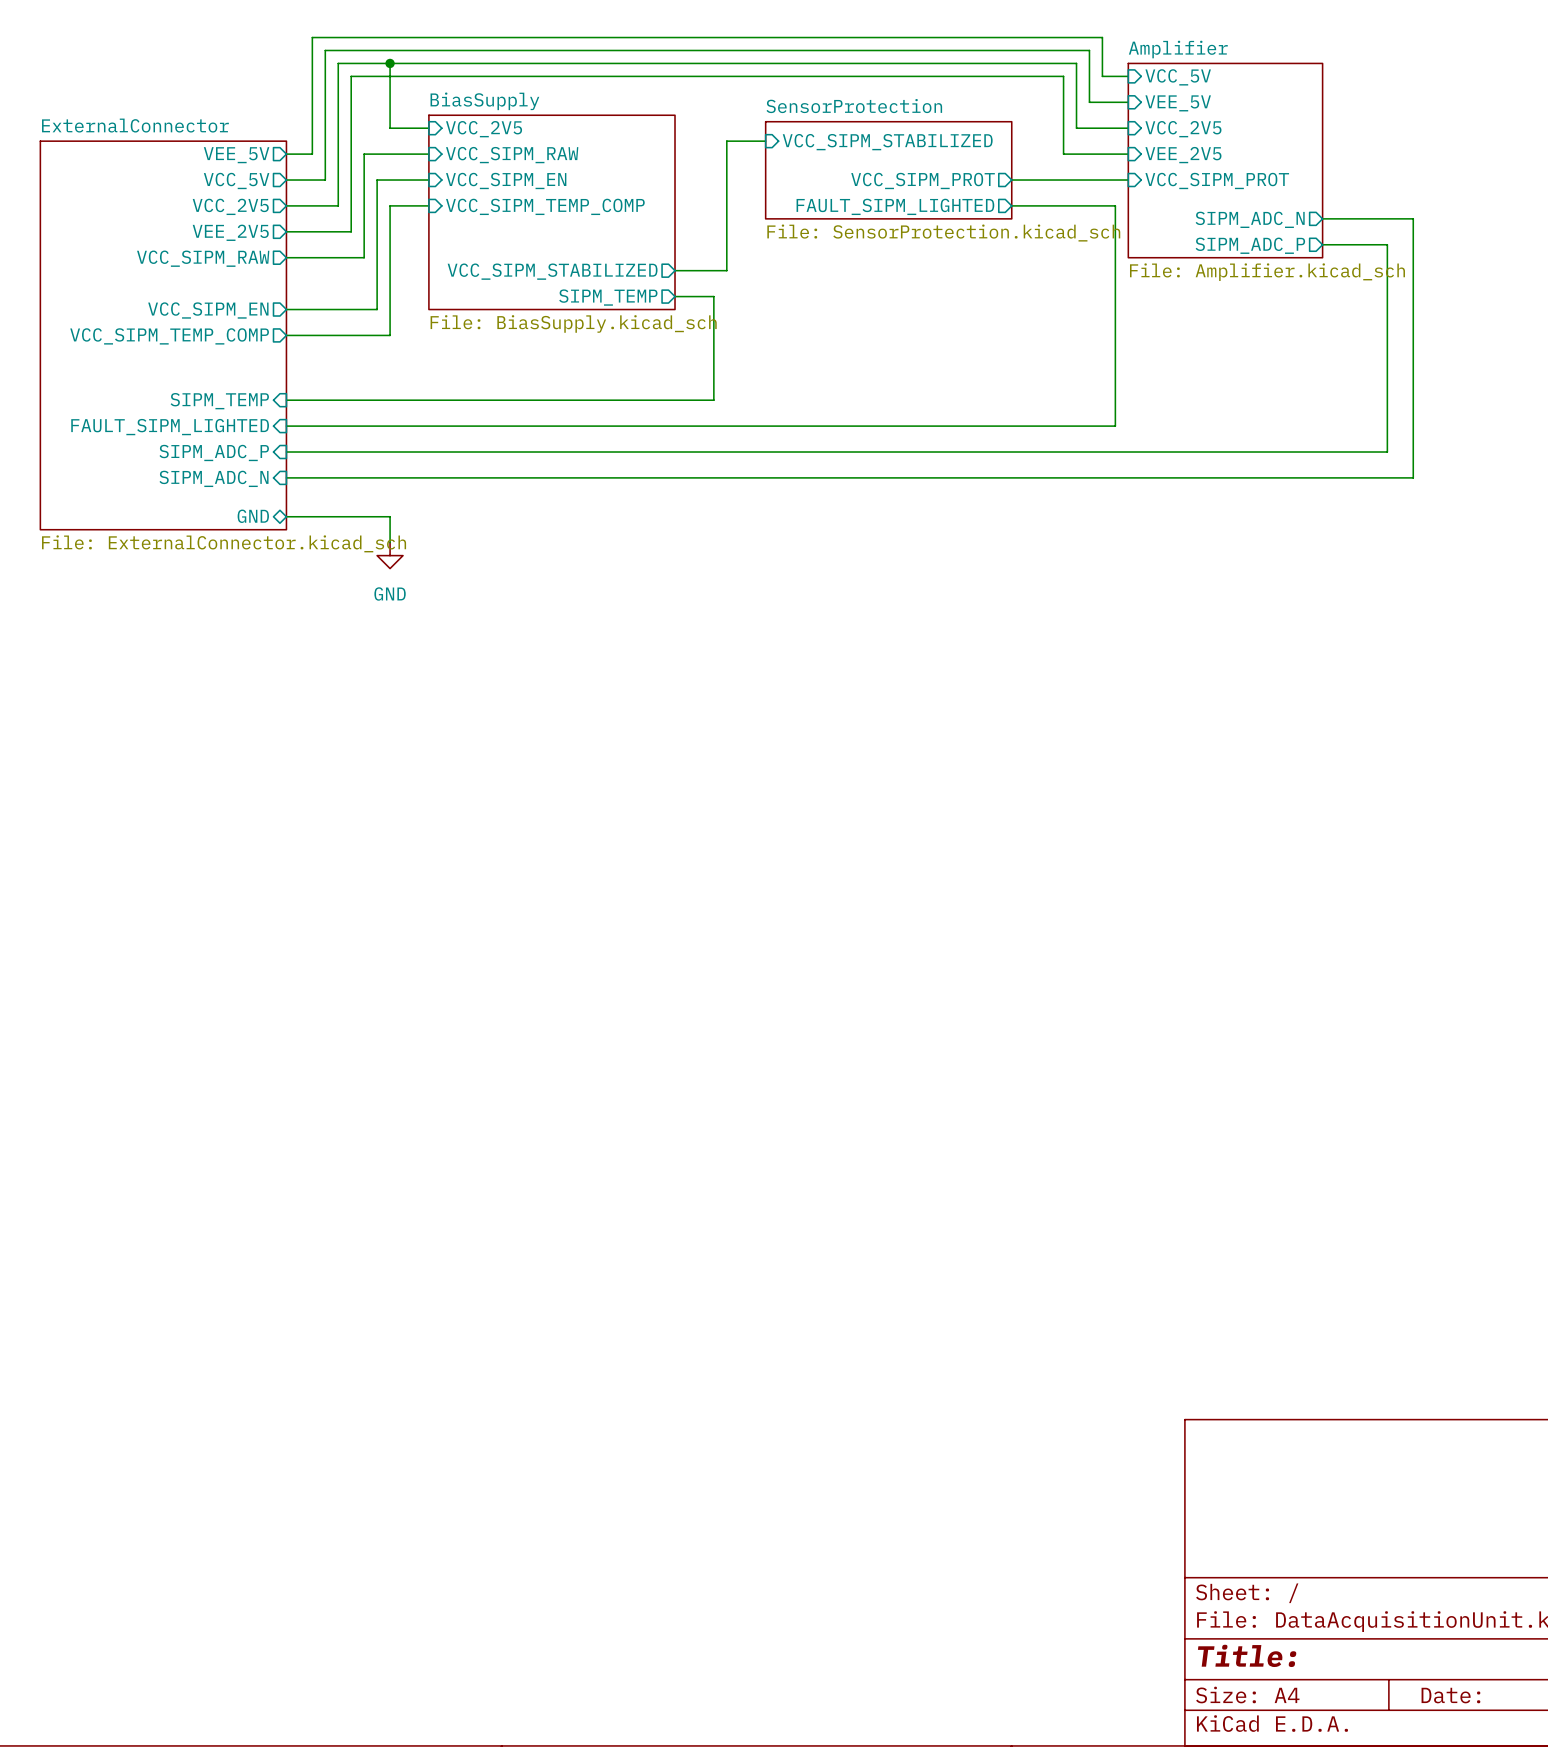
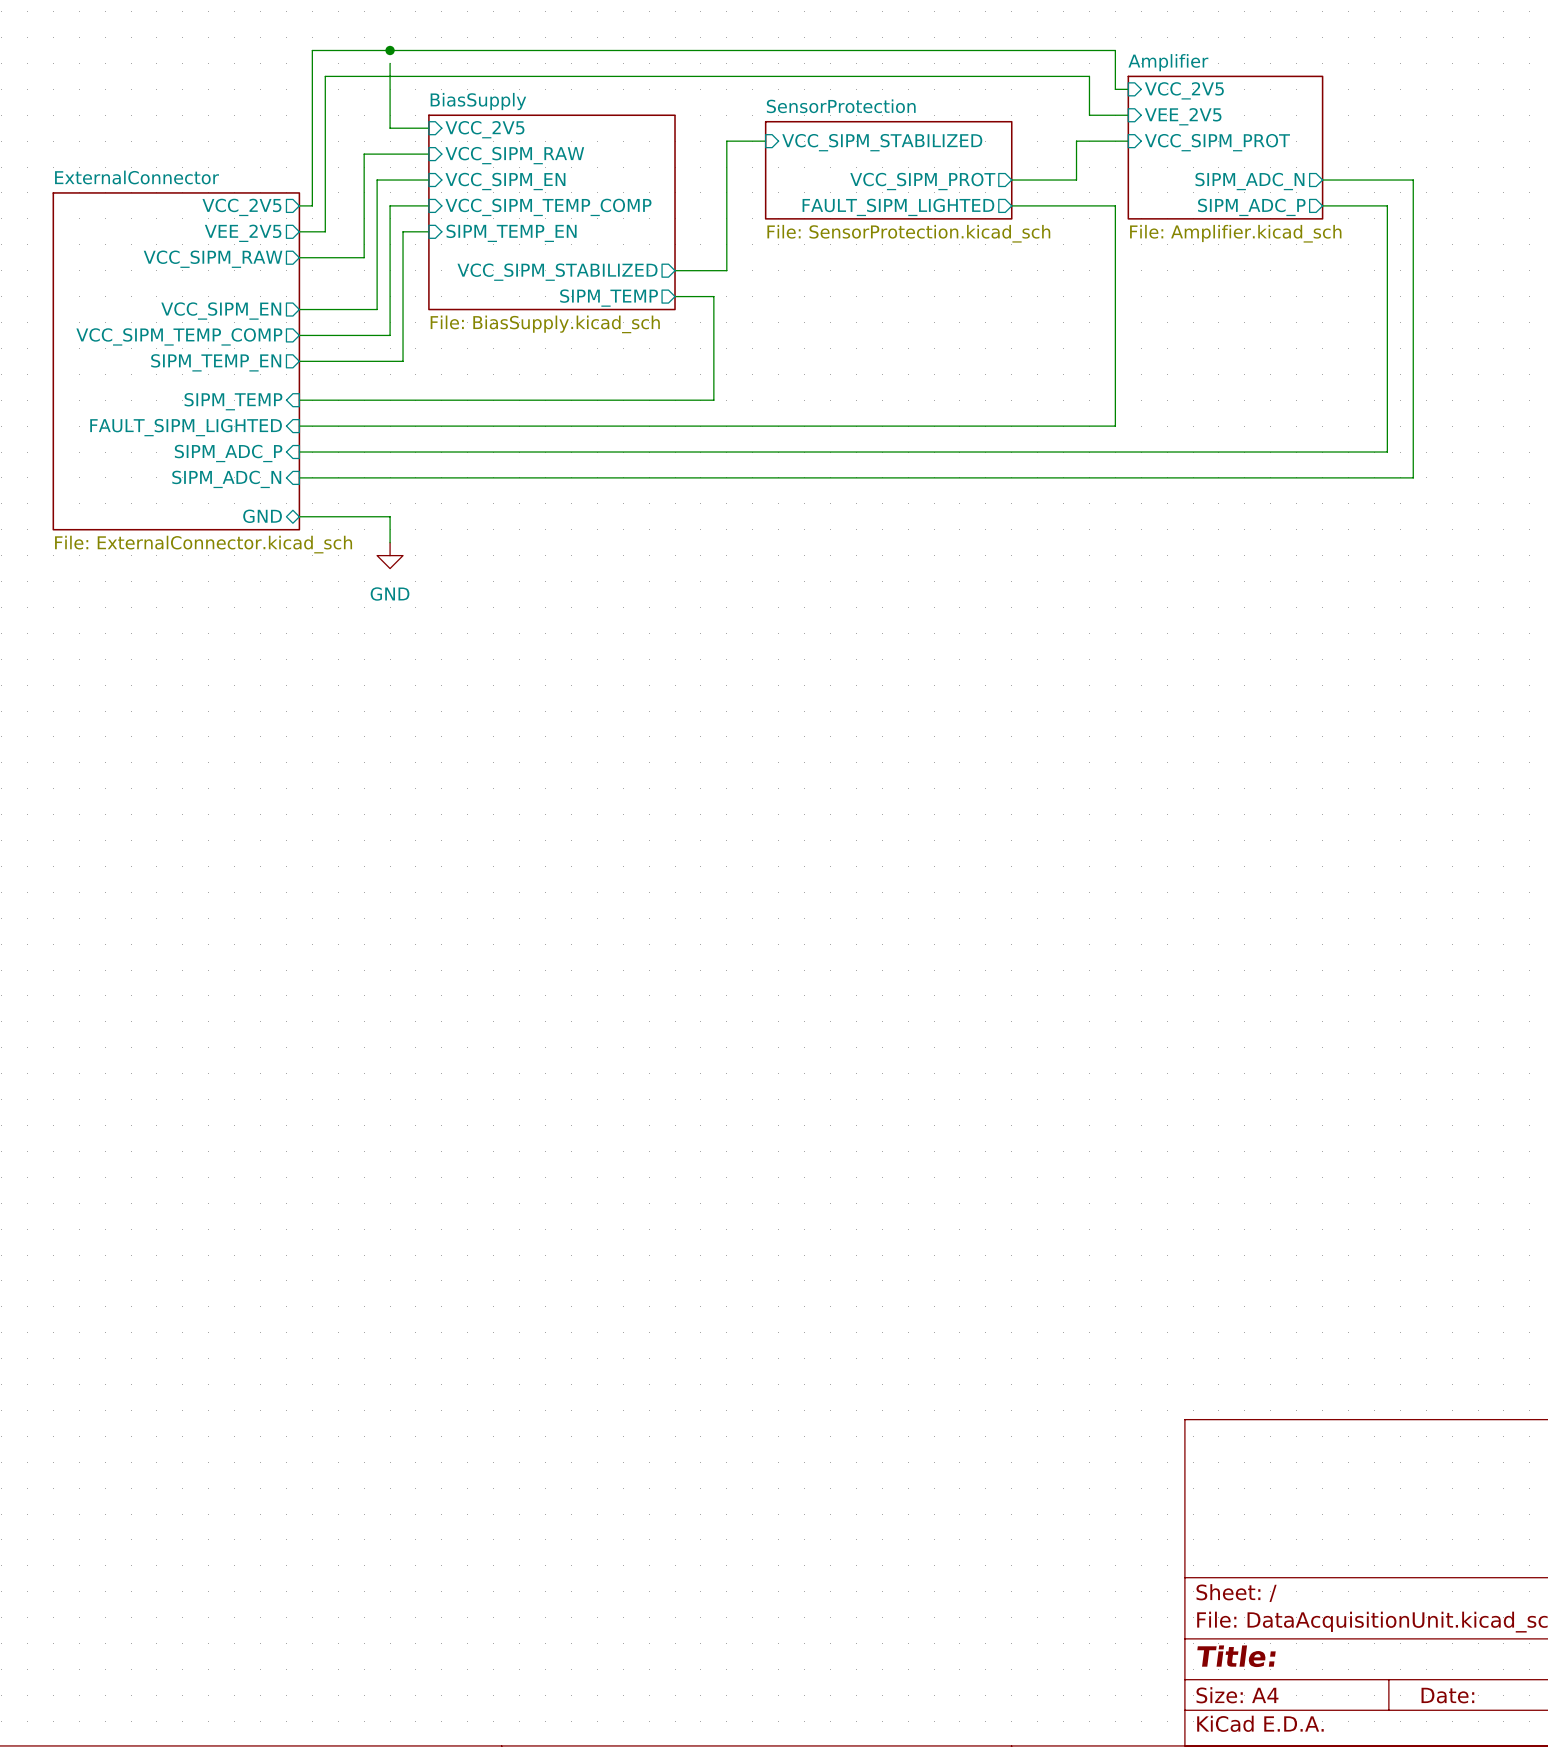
wire: (312, 50) (312, 37) (1102, 37) (1102, 76) (1128, 76) -> none
wire: (325, 50) (325, 76) -> (325, 50) (312, 50)
wire: (1089, 50) (1089, 76) -> (1063, 76) (1089, 76)
wire: none -> (1089, 50) (1115, 50) (1115, 89) (1128, 89)
junction position: (390, 63) -> (390, 50)
wire: (351, 76) (351, 231) (325, 231) -> (351, 76) (325, 76)
wire: (1063, 76) (1063, 154) (1128, 154) -> none
sheet pin: VCC_5V (1178, 77) -> none
wire: (1089, 102) (1128, 102) -> (1089, 102) (1089, 115) (1128, 115)
sheet pin: VEE_5V (1178, 103) -> none
wire: (1128, 128) (1076, 128) (1076, 63) (338, 63) (338, 205) (312, 205) -> none
sheet pin position: VCC_2V5 (1183, 129) -> VCC_2V5 (1184, 90)
sheet Amplifier: none -> File: Amplifier.kicad_sch (1225, 147)
wire: (286, 154) (312, 154) -> (312, 205) (312, 154)
sheet pin: VEE_5V (236, 155) -> none
sheet pin position: VEE_2V5 (1183, 155) -> VEE_2V5 (1183, 116)
sheet Amplifier: File: Amplifier.kicad_sch (1225, 160) -> none
sheet pin: VCC_5V (236, 180) -> none
wire: (286, 180) (325, 180) -> (325, 231) (325, 180)
wire: (1076, 180) (1128, 180) -> (1076, 180) (1076, 141) (1128, 141)
sheet pin position: VCC_SIPM_PROT (1217, 180) -> VCC_SIPM_PROT (1217, 142)
wire: (286, 205) (299, 205) -> none
sheet pin position: VCC_2V5 (230, 206) -> VCC_2V5 (241, 207)
wire: (1322, 218) (1413, 218) -> (1322, 180) (1413, 180) (1413, 218)
sheet pin position: SIPM_ADC_N (1250, 219) -> SIPM_ADC_N (1249, 181)
wire: (286, 231) (299, 231) -> none
wire: none -> (428, 231) (403, 231) (403, 361) (299, 361)
sheet pin position: VEE_2V5 (230, 232) -> VEE_2V5 (243, 233)
sheet pin: none -> SIPM_TEMP_EN (511, 233)
wire: (1322, 244) (1387, 244) -> (1322, 205) (1387, 205) (1387, 244)
sheet pin position: SIPM_ADC_P (1250, 245) -> SIPM_ADC_P (1251, 207)
wire: (286, 257) (299, 257) -> none
sheet pin position: VCC_SIPM_RAW (203, 258) -> VCC_SIPM_RAW (213, 259)
wire: (286, 309) (299, 309) -> none
sheet pin position: VCC_SIPM_EN (208, 310) -> VCC_SIPM_EN (221, 311)
sheet ExternalConnector: File: ExternalConnector.kicad_sch (163, 335) -> none
wire: (286, 335) (299, 335) -> none
sheet pin position: VCC_SIPM_TEMP_COMP (169, 336) -> VCC_SIPM_TEMP_COMP (179, 336)
sheet ExternalConnector: none -> File: ExternalConnector.kicad_sch (176, 361)
sheet pin: none -> SIPM_TEMP_EN (216, 362)
wire: (286, 400) (299, 400) -> none
sheet pin position: SIPM_TEMP (219, 401) -> SIPM_TEMP (233, 401)
wire: (286, 426) (299, 426) -> none
sheet pin position: FAULT_SIPM_LIGHTED (170, 427) -> FAULT_SIPM_LIGHTED (186, 427)
sheet pin position: SIPM_ADC_P (214, 452) -> SIPM_ADC_P (228, 453)
wire: (286, 452) (299, 452) -> none
wire: (286, 477) (299, 477) -> none
sheet pin position: SIPM_ADC_N (214, 478) -> SIPM_ADC_N (226, 479)
sheet pin position: GND (253, 516) -> GND (262, 516)
wire: (286, 516) (299, 516) -> none

